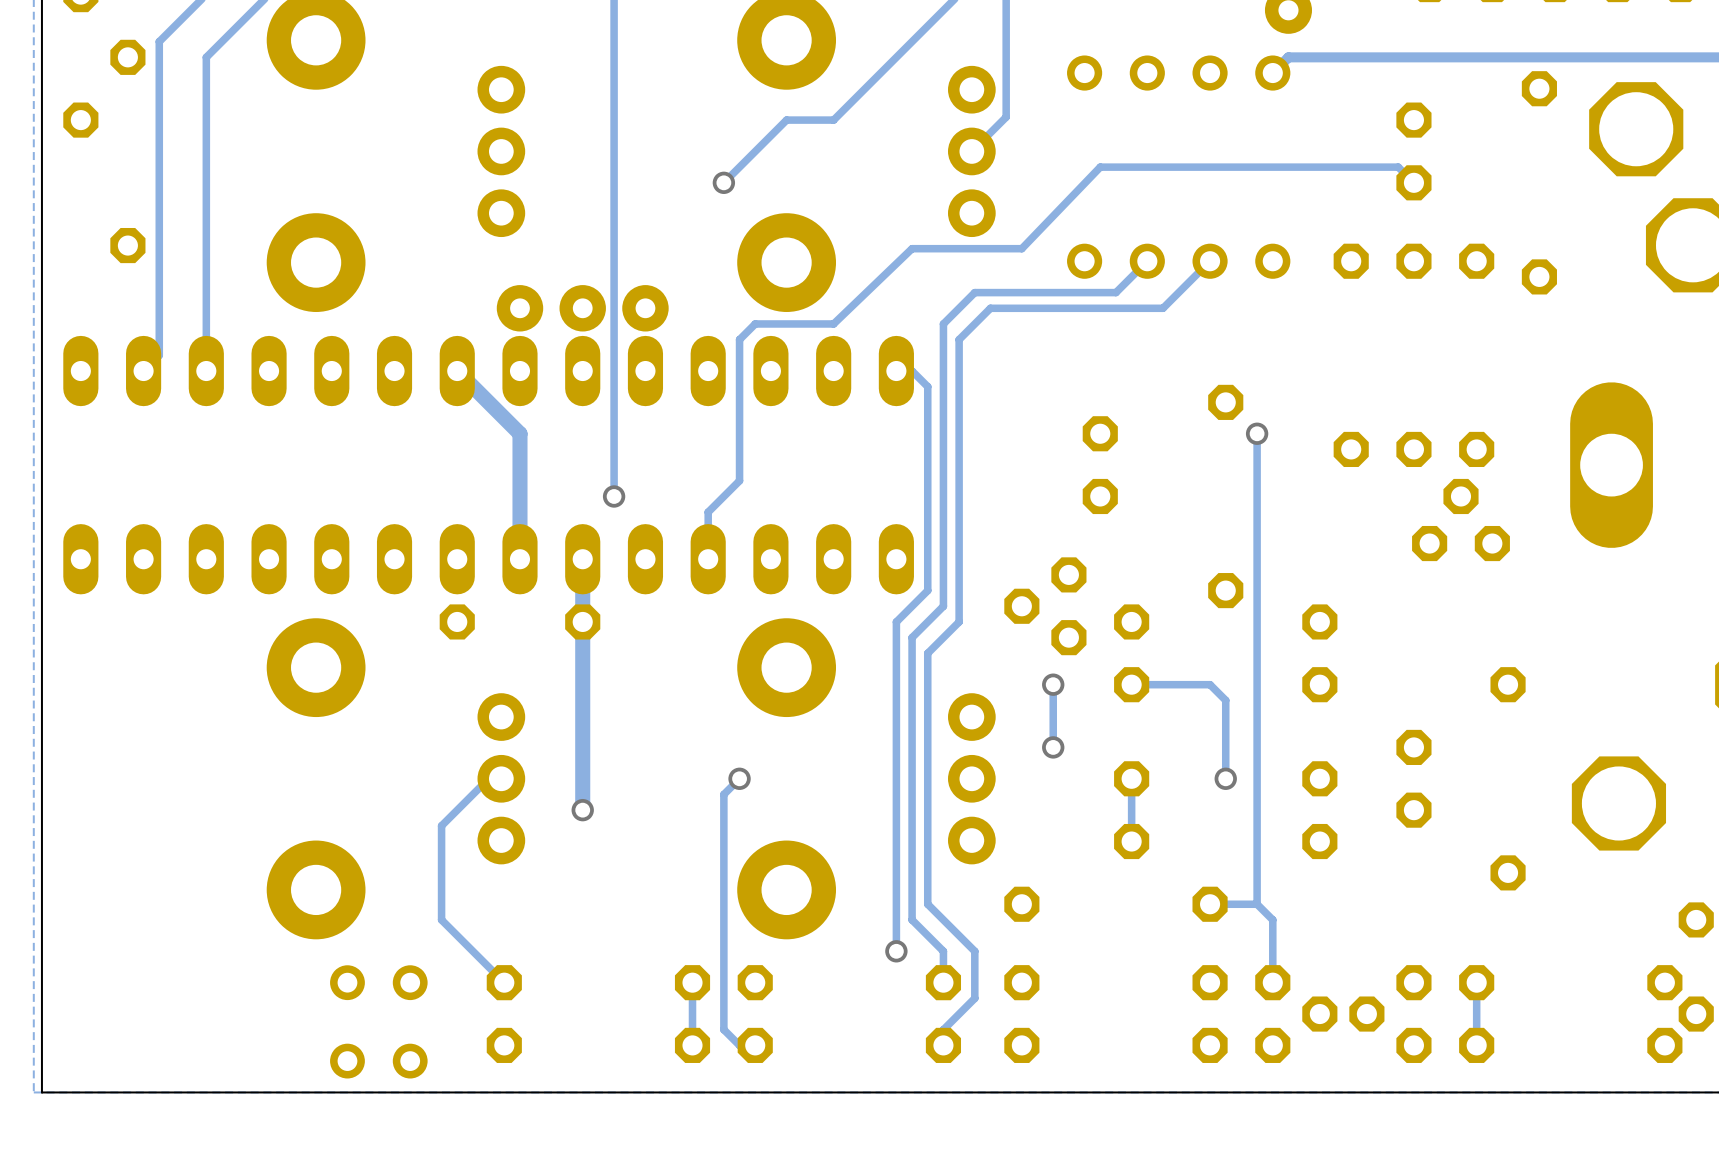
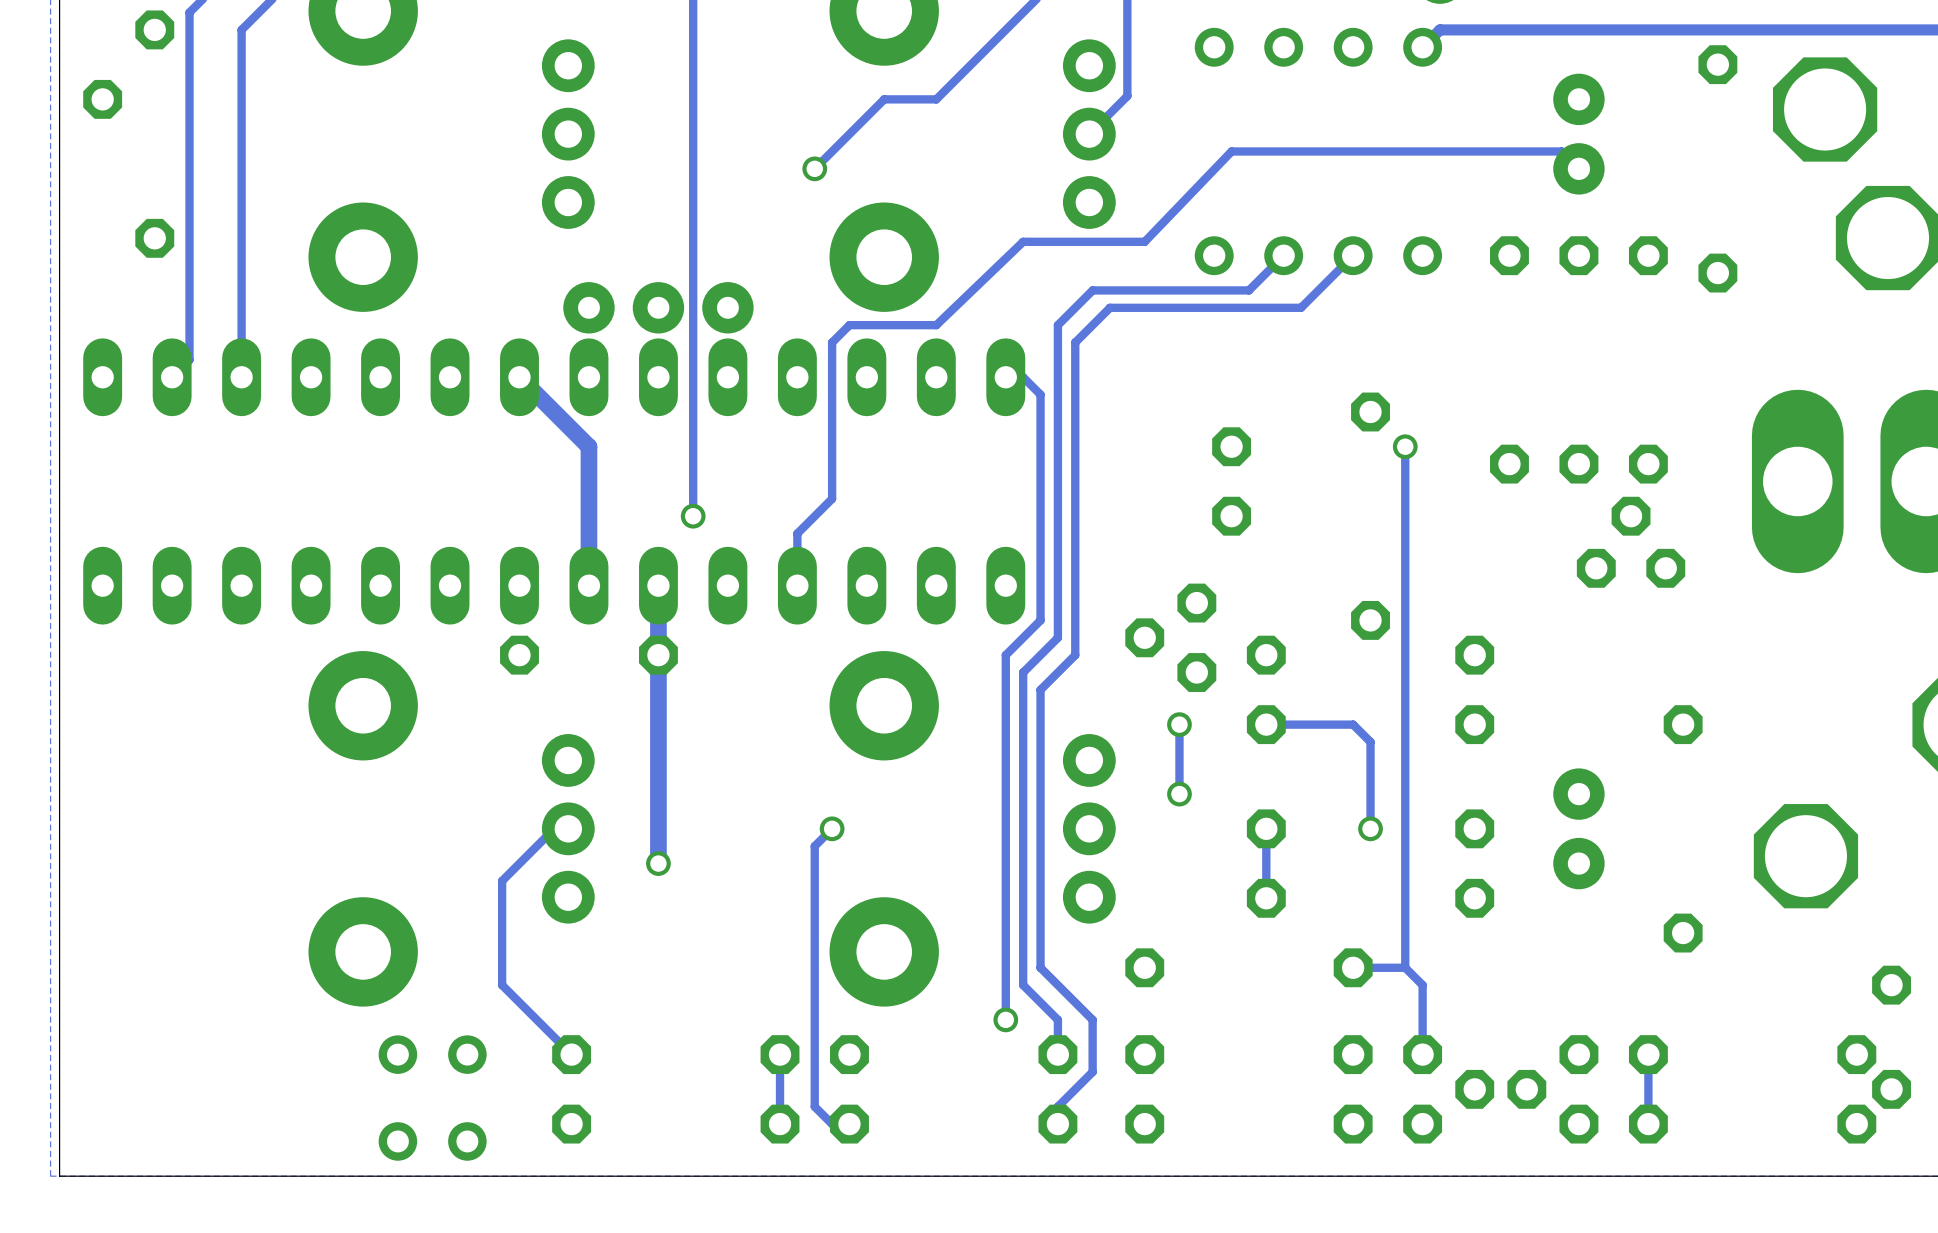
part footprint: [1396, 102, 1432, 201] -> [1553, 73, 1605, 195]
part footprint: [1396, 729, 1432, 828] -> [1553, 768, 1605, 890]

